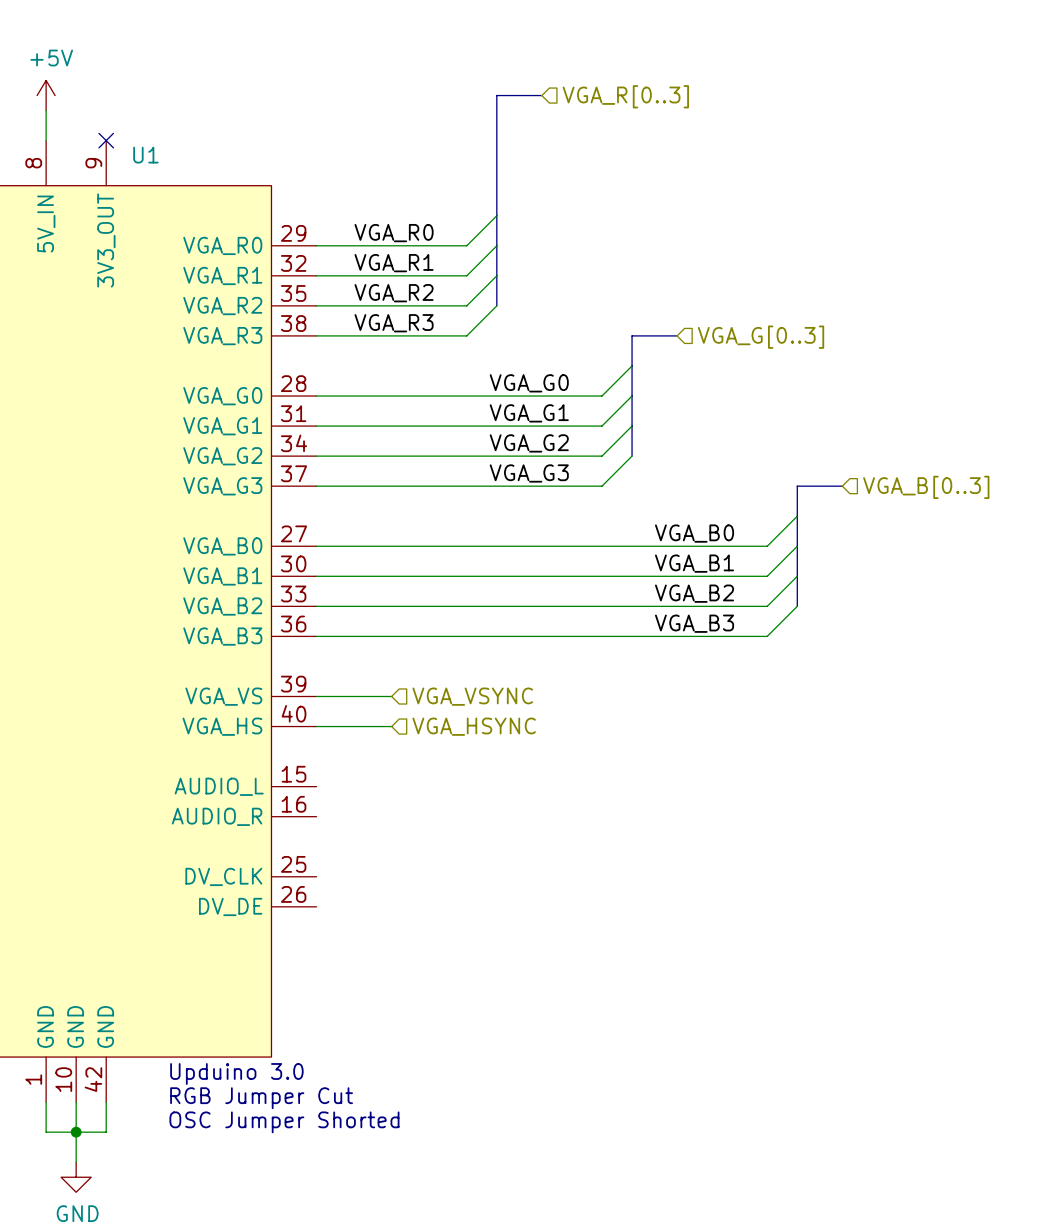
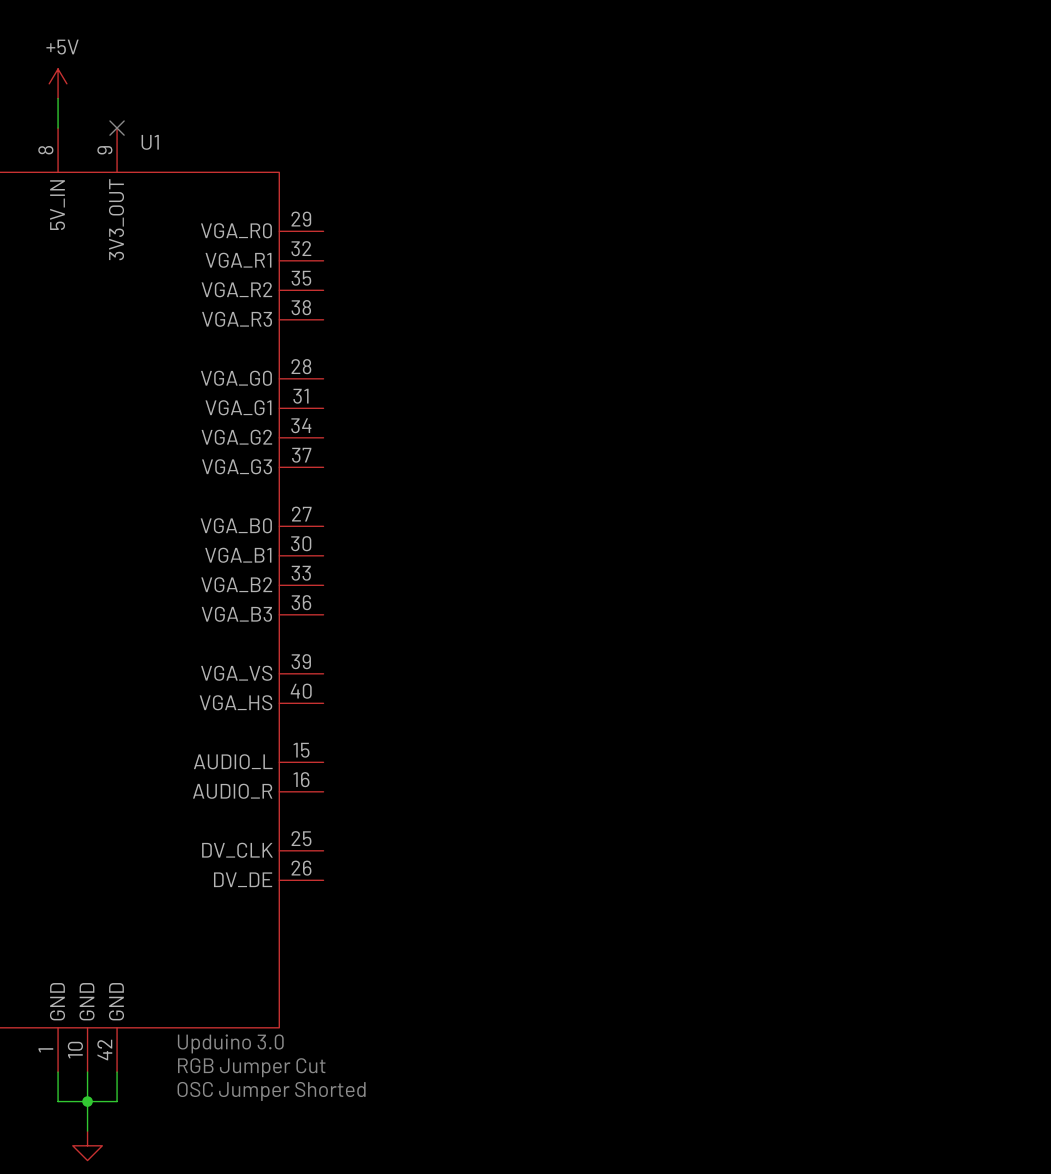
bus: (541, 95) (496, 95) (496, 305) -> none
hierarchical label: VGA_R[0..3] (625, 96) -> none
wire: (496, 215) (466, 245) (316, 245) -> none
label: VGA_R0 (394, 233) -> none
wire: (496, 245) (466, 275) (316, 275) -> none
label: VGA_R1 (394, 263) -> none
wire: (496, 275) (466, 305) (316, 305) -> none
label: VGA_R2 (394, 293) -> none
wire: (496, 305) (466, 335) (316, 335) -> none
label: VGA_R3 (394, 323) -> none
bus: (677, 335) (632, 335) (632, 456) -> none
hierarchical label: VGA_G[0..3] (761, 337) -> none
wire: (632, 365) (601, 396) (316, 396) -> none
label: VGA_G0 (529, 383) -> none
wire: (632, 396) (601, 426) (316, 426) -> none
label: VGA_G1 (529, 413) -> none
wire: (632, 426) (601, 456) (316, 456) -> none
label: VGA_G2 (529, 443) -> none
wire: (632, 456) (601, 486) (316, 486) -> none
label: VGA_G3 (529, 473) -> none
bus: (842, 486) (797, 486) (797, 606) -> none
hierarchical label: VGA_B[0..3] (926, 487) -> none
wire: (797, 516) (767, 546) (316, 546) -> none
label: VGA_B0 (694, 533) -> none
wire: (797, 546) (767, 576) (316, 576) -> none
label: VGA_B1 (694, 563) -> none
wire: (797, 576) (767, 606) (316, 606) -> none
label: VGA_B2 (694, 593) -> none
wire: (797, 606) (767, 636) (316, 636) -> none
label: VGA_B3 (694, 623) -> none
wire: (316, 696) (391, 696) -> none
hierarchical label: VGA_VSYNC (472, 696) -> none
wire: (316, 726) (391, 726) -> none
hierarchical label: VGA_HSYNC (474, 726) -> none

